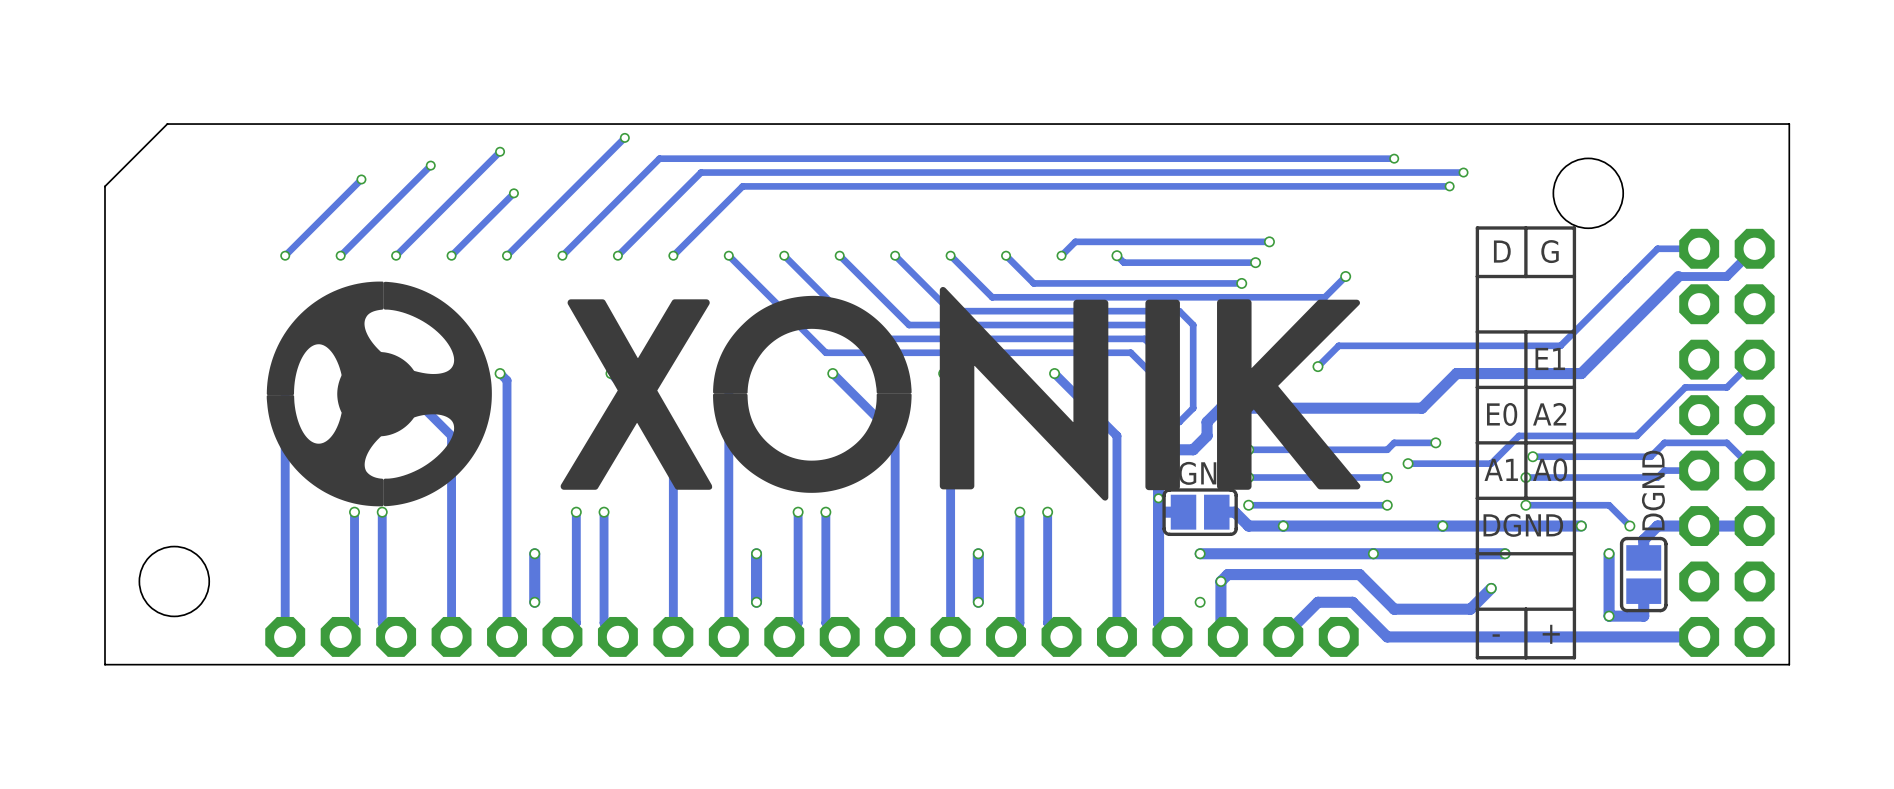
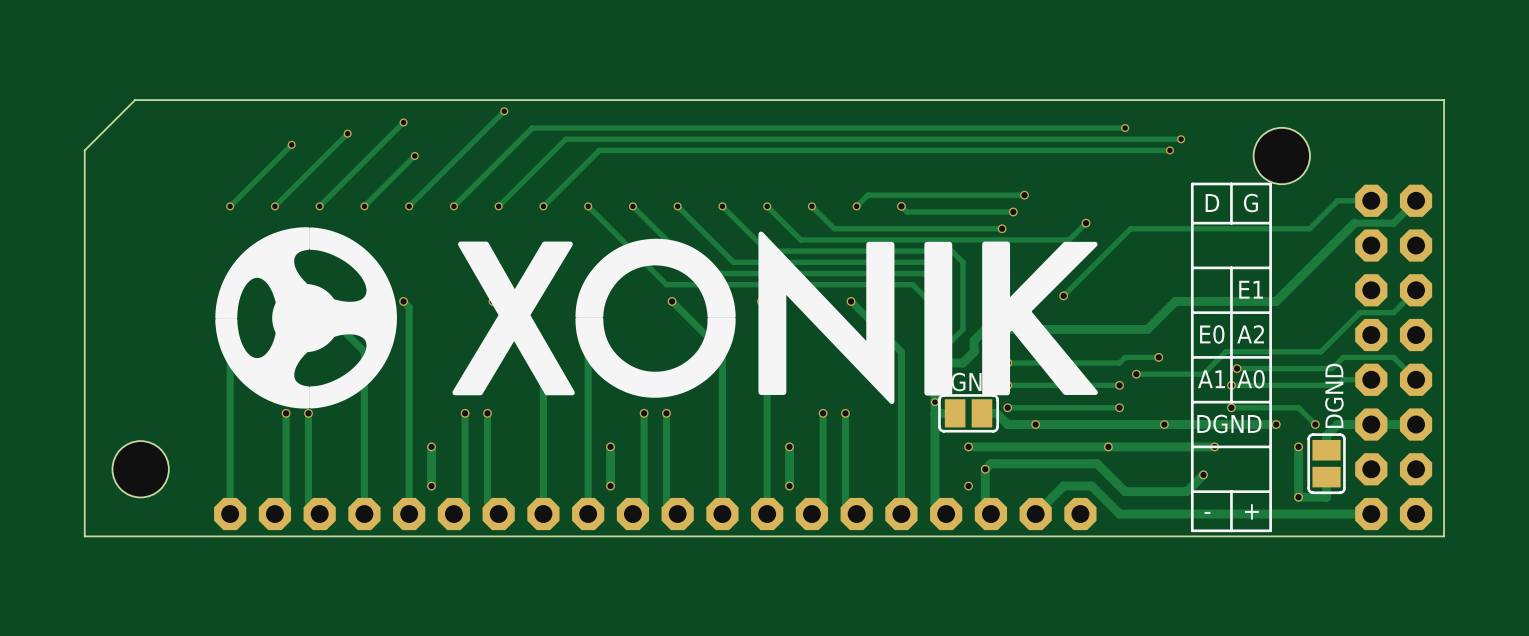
track: (1622, 283) (1560, 345) (1338, 345) -> (1309, 228) (1130, 228) (1080, 279)

